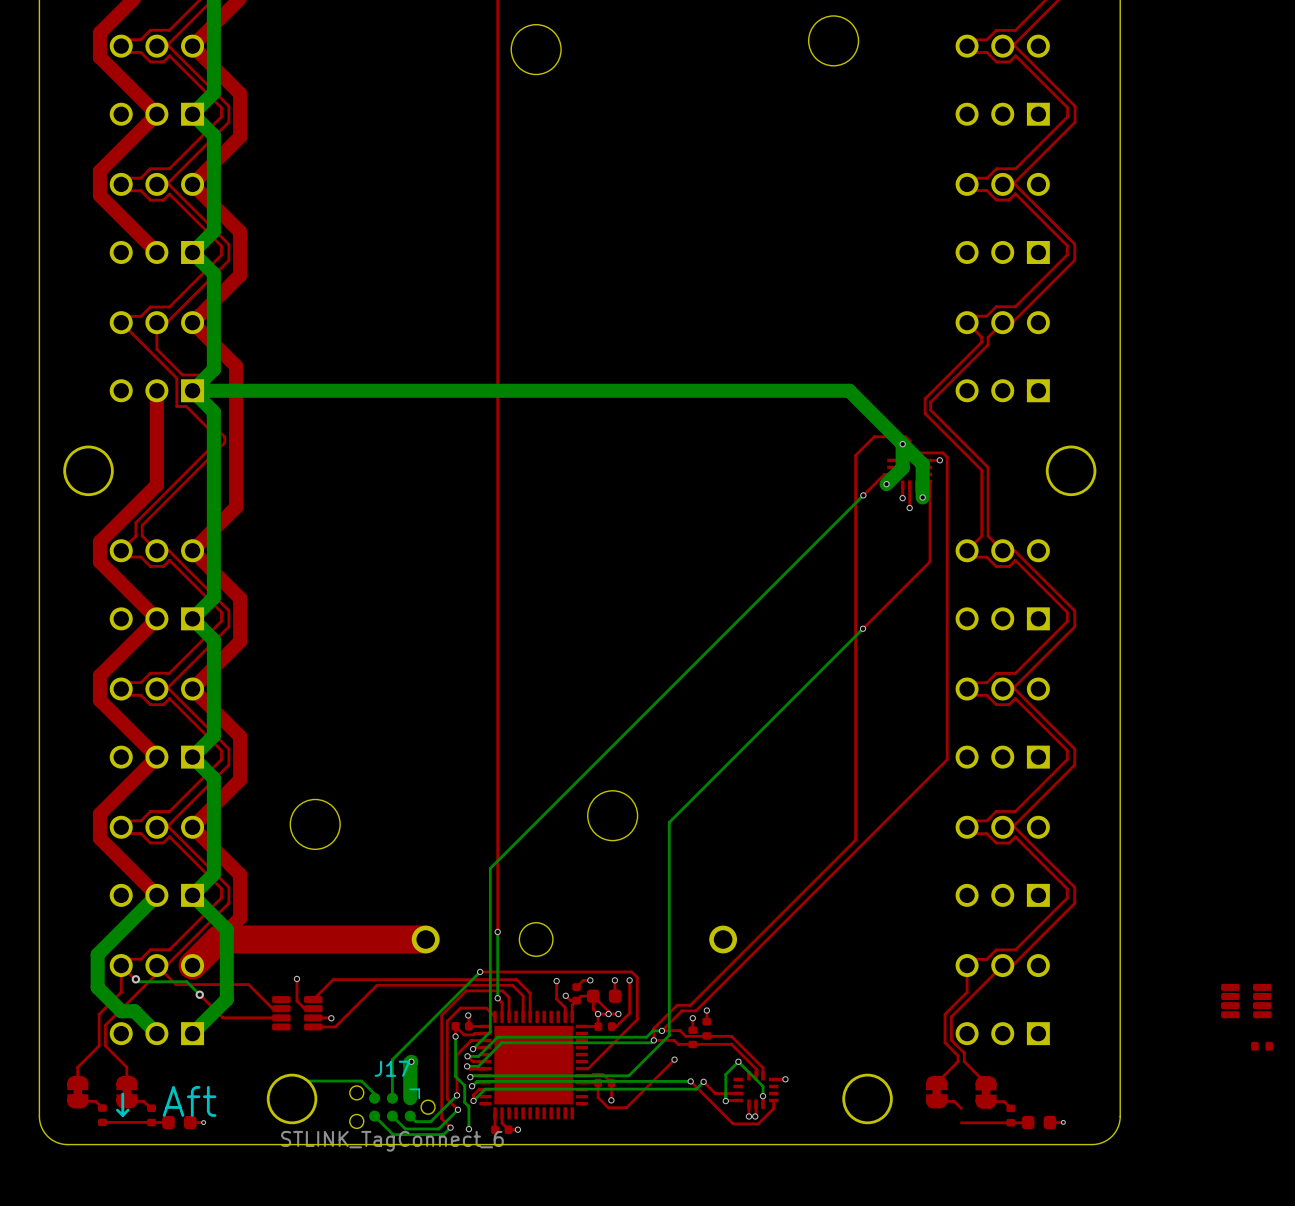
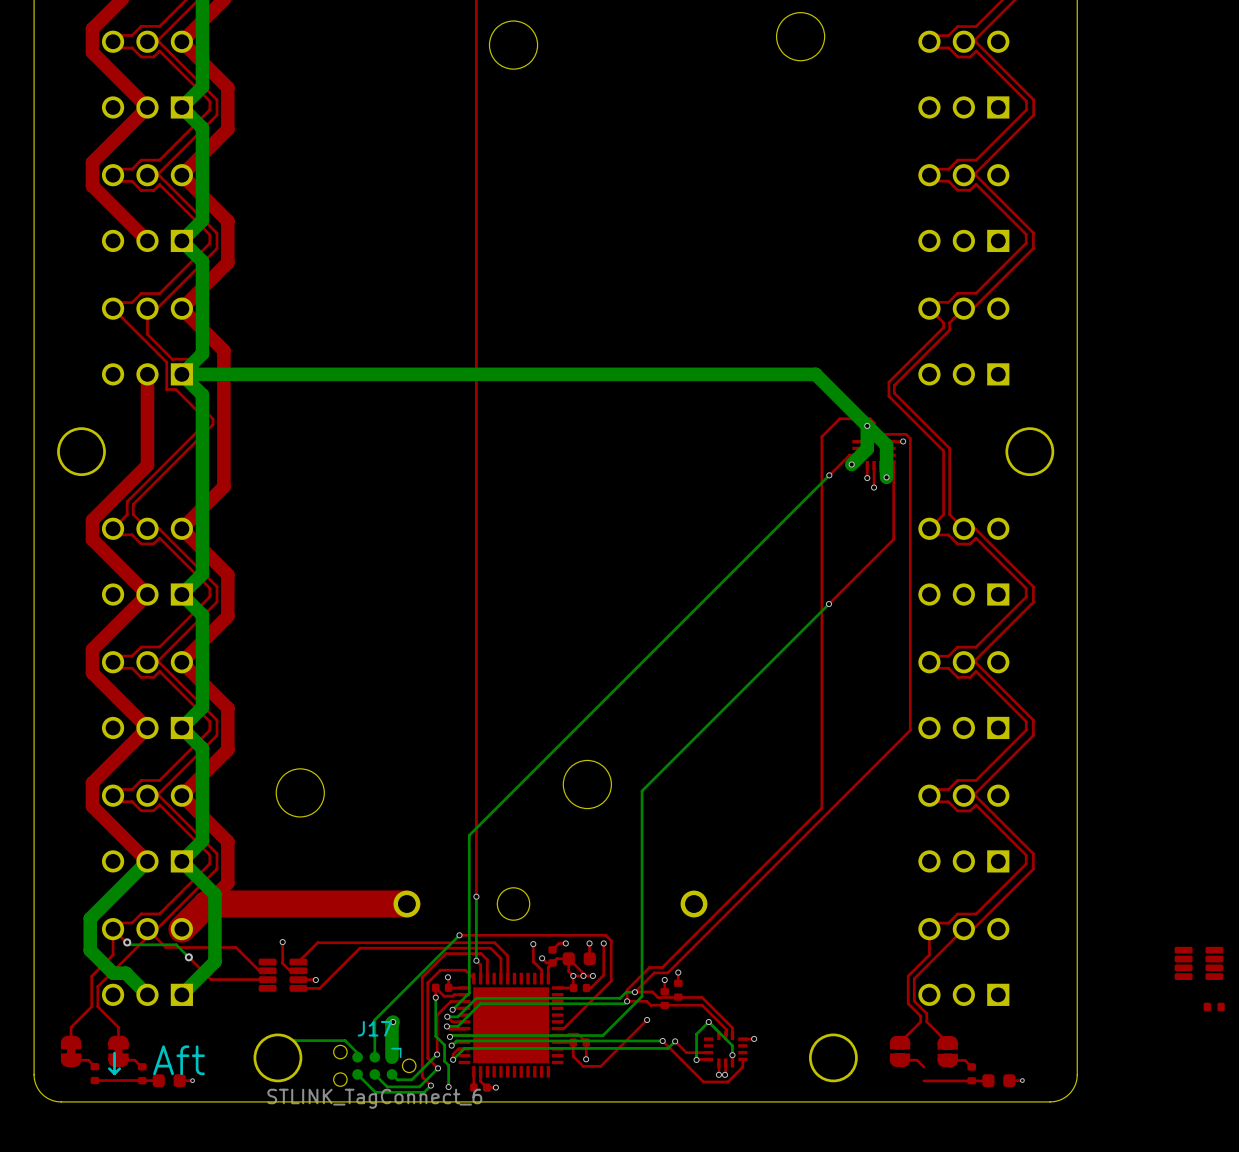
part footprint: [926, 1076, 948, 1109] -> [889, 1035, 911, 1067]
part footprint: [975, 1076, 997, 1109] -> [937, 1036, 958, 1068]

